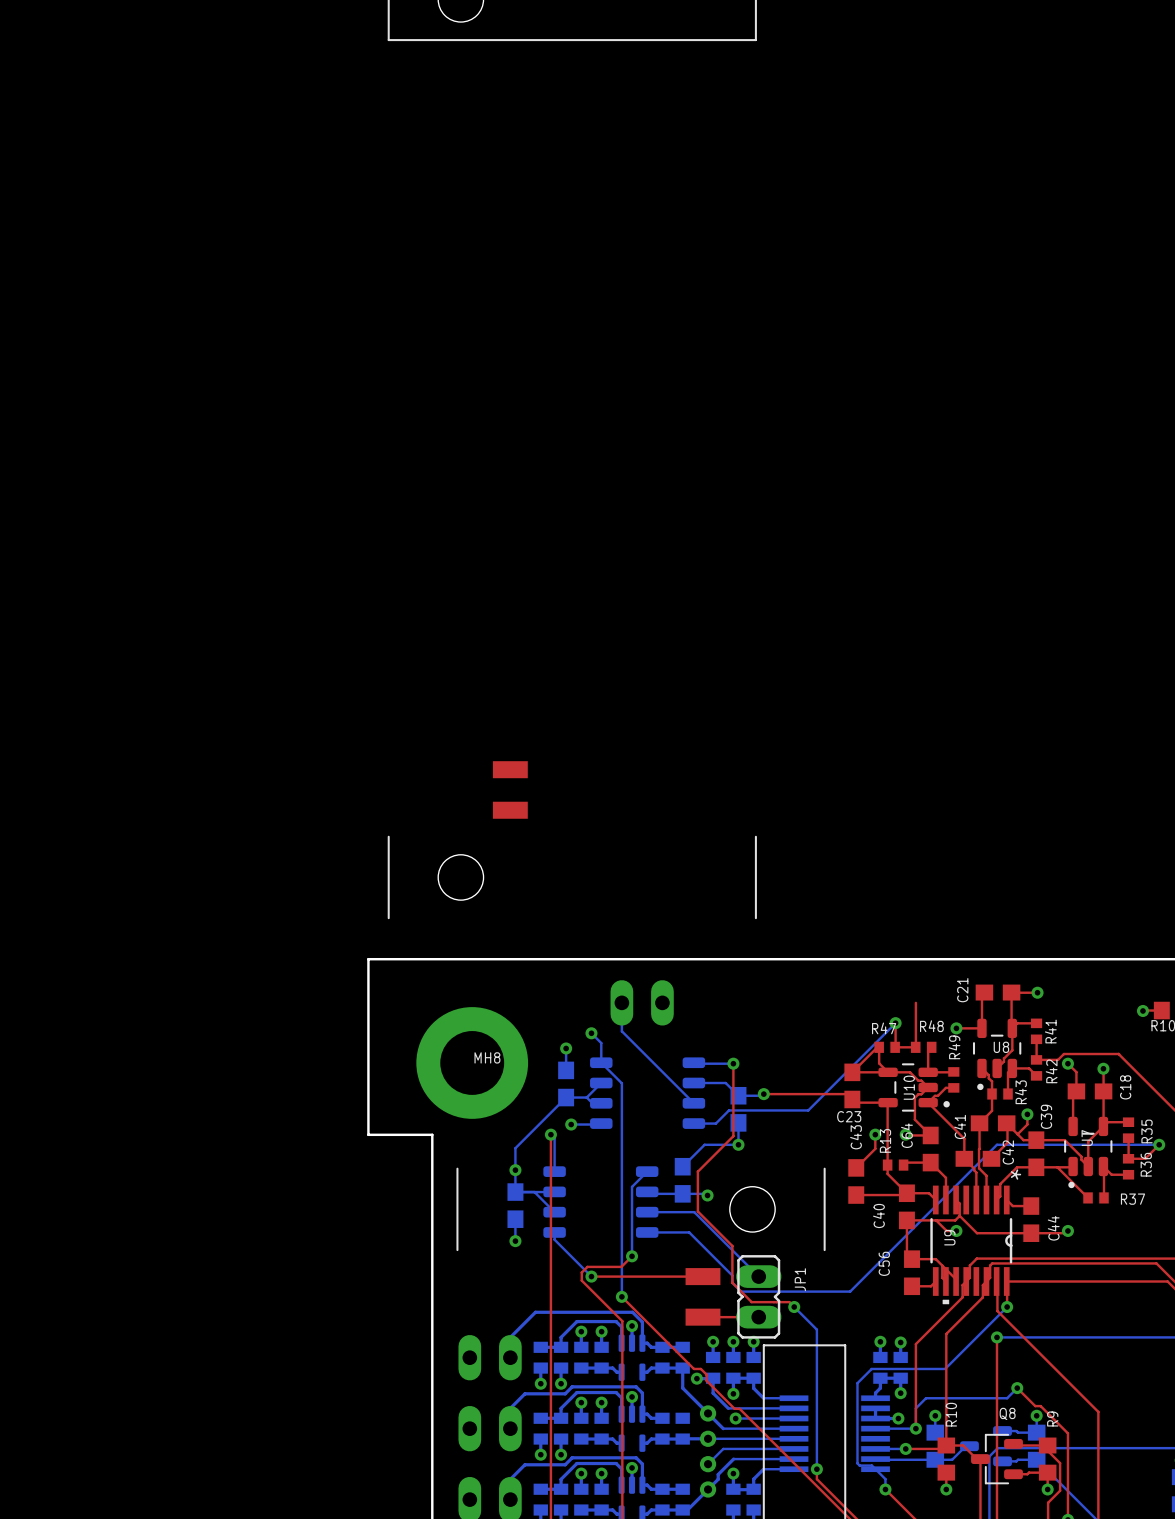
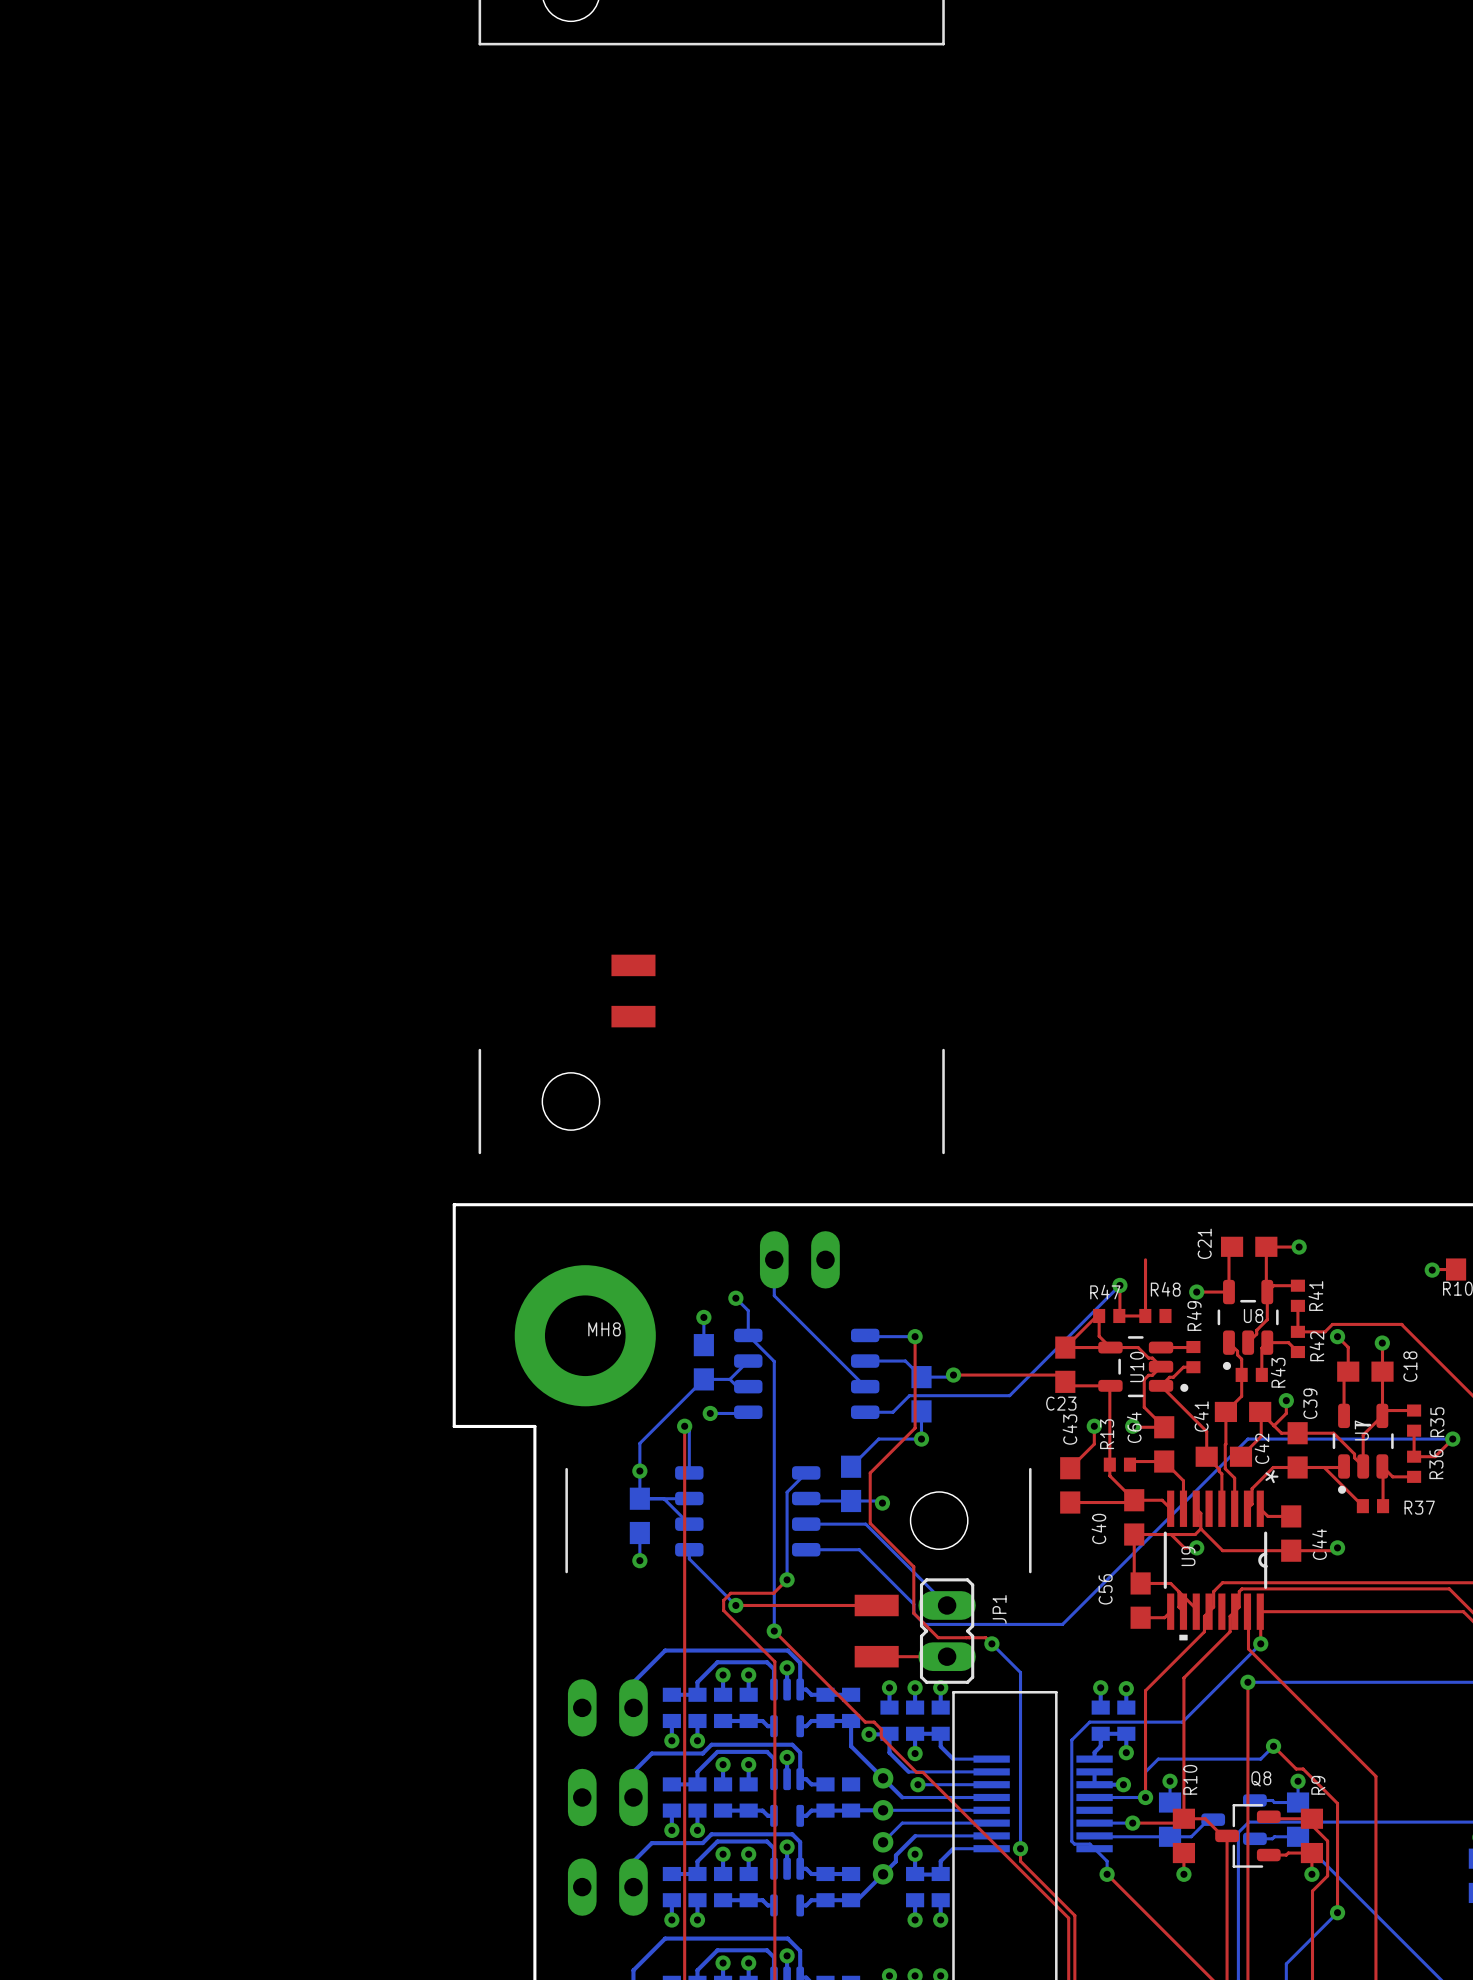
top track: (931, 1047) (928, 1050) (928, 1072) -> none

